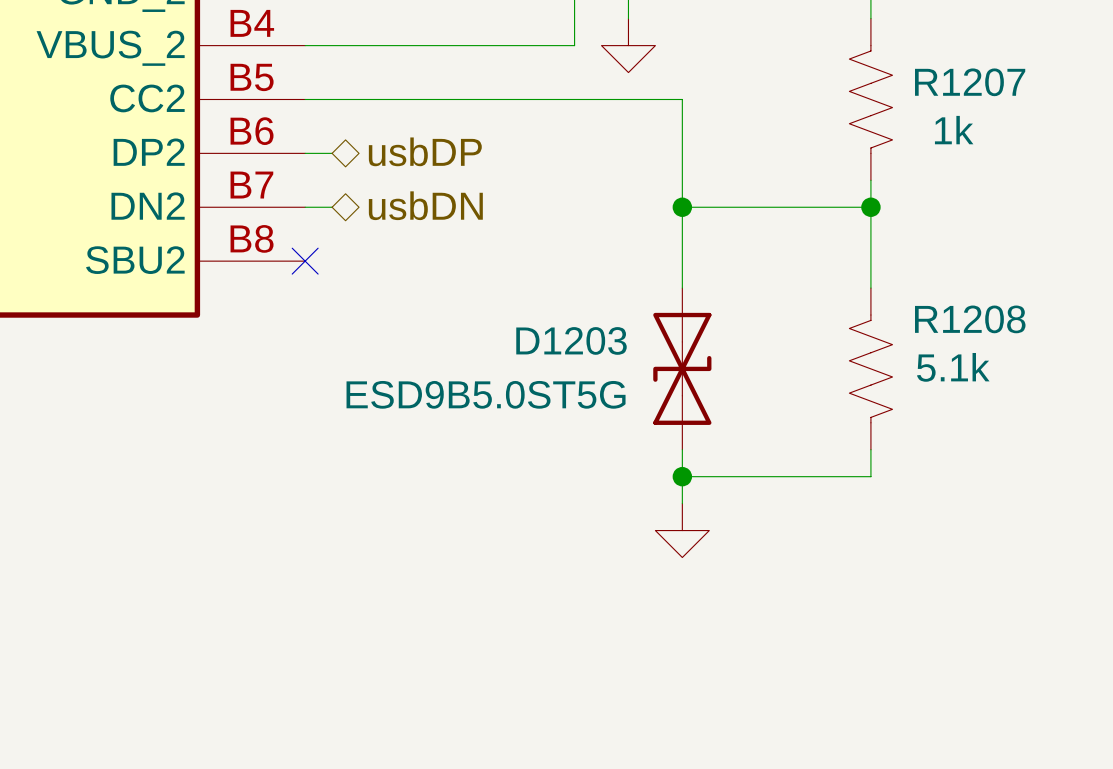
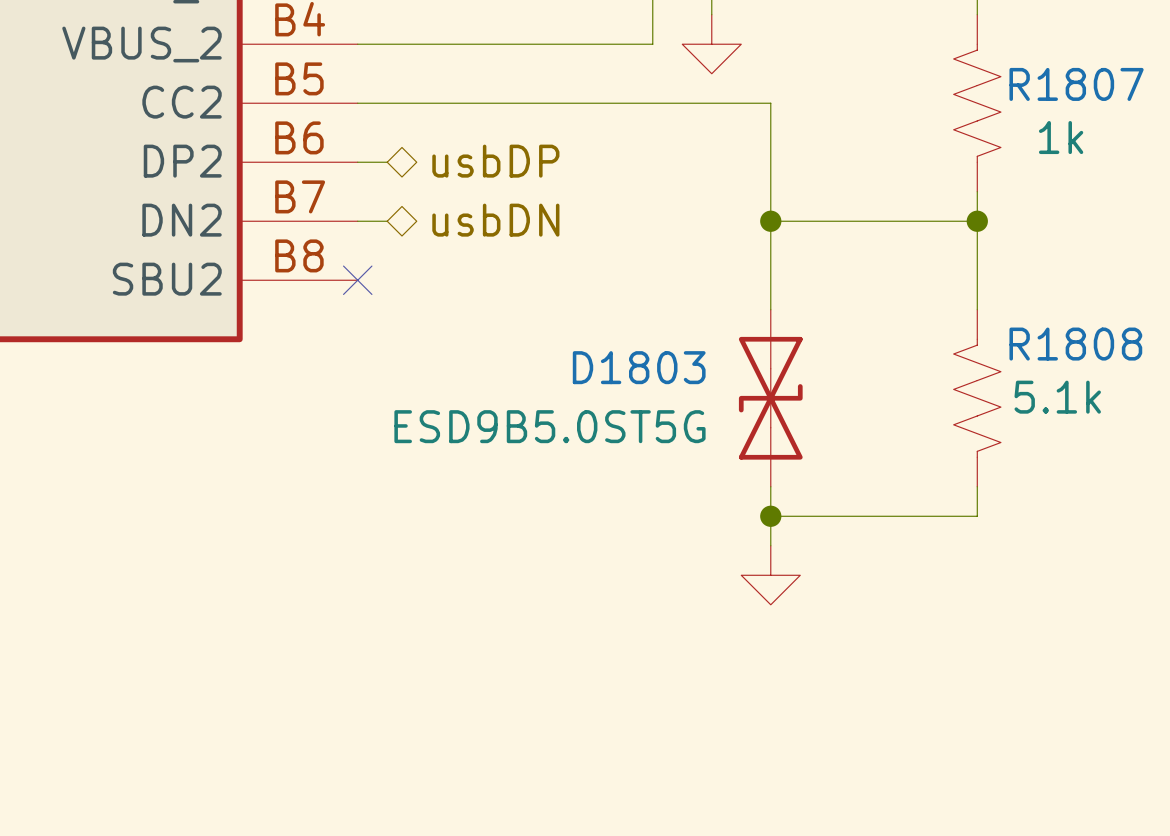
R1207 name: R1207 (970, 82) -> R1807 (1076, 84)
R1208 name: R1208 (970, 319) -> R1808 (1075, 344)
D1203 name: D1203 (571, 340) -> D1803 (639, 367)

